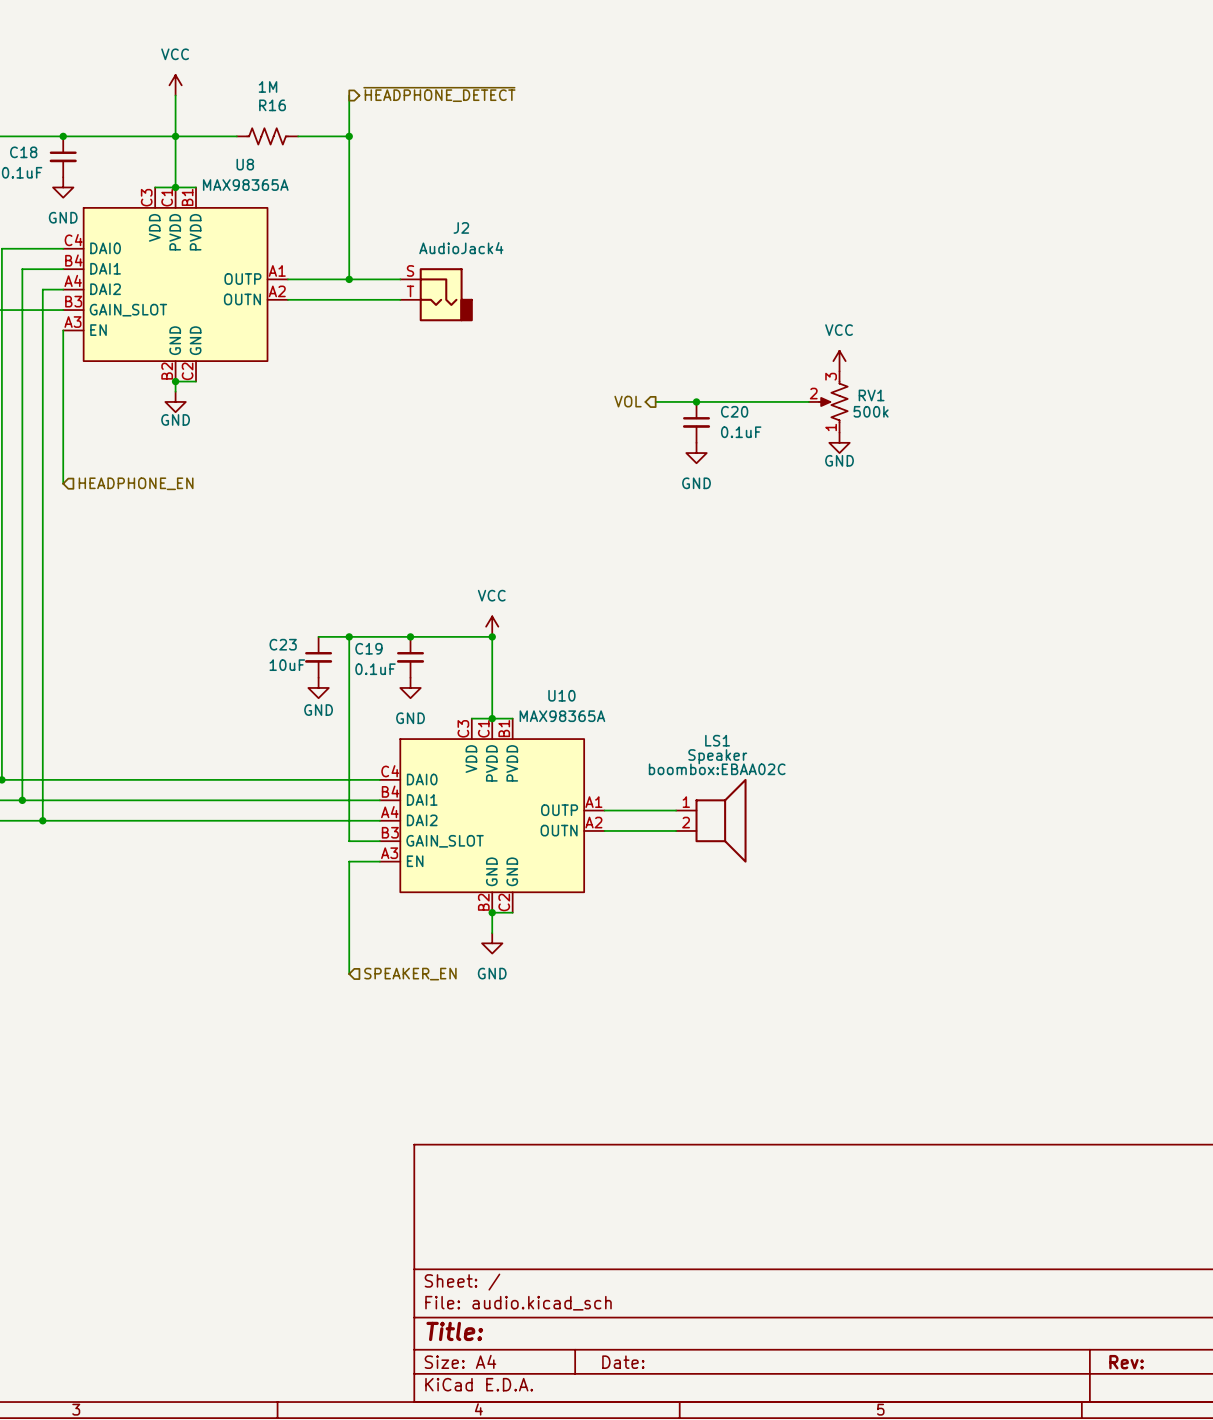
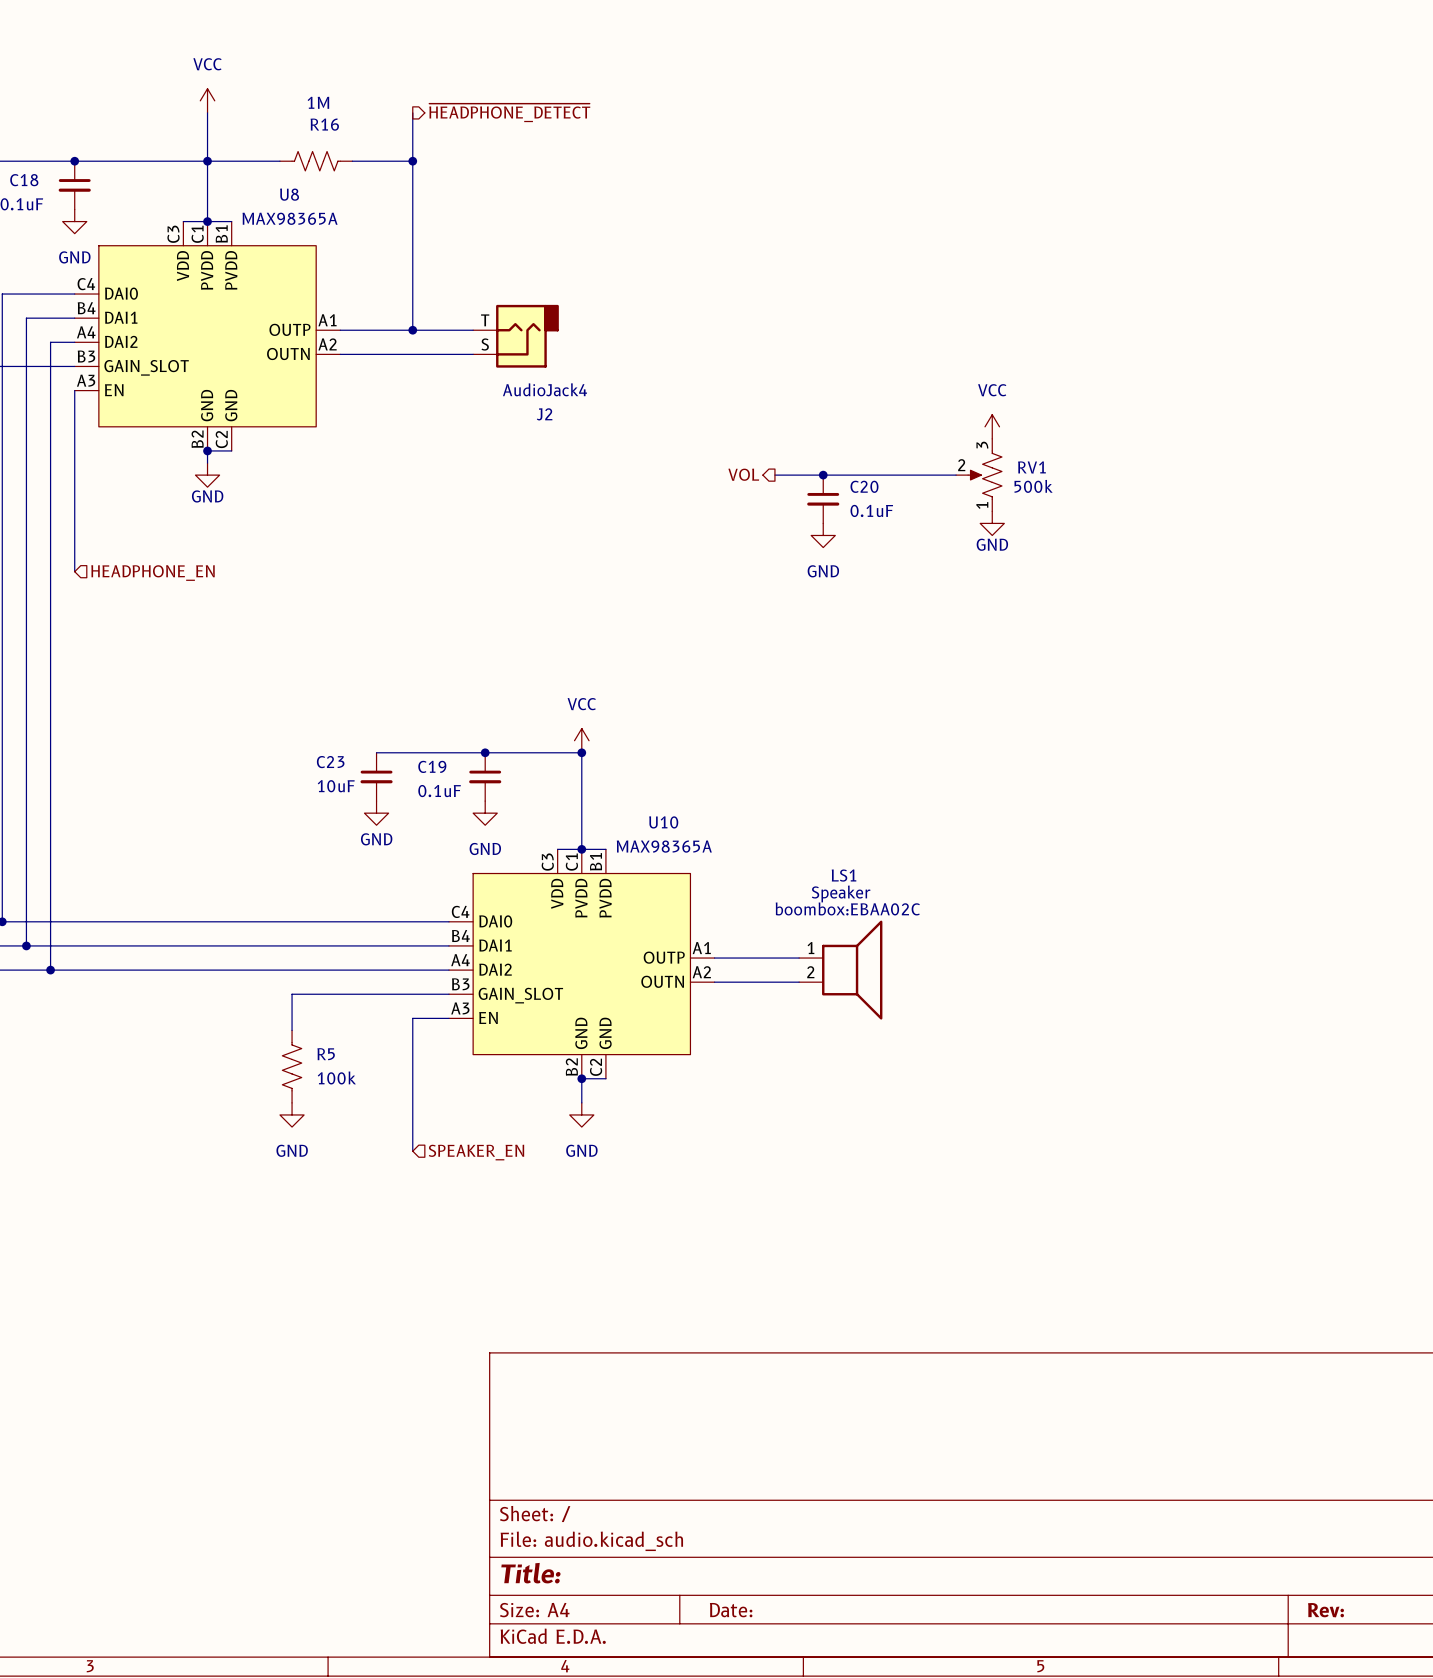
J2 flip: as is (446, 294) -> up-down (527, 336)
wire: (349, 636) (349, 841) -> (292, 1030) (292, 994) (412, 994)
junction: (349, 636) -> none
R5: none -> 100k (292, 1066)
power symbol: none -> GND (292, 1114)

